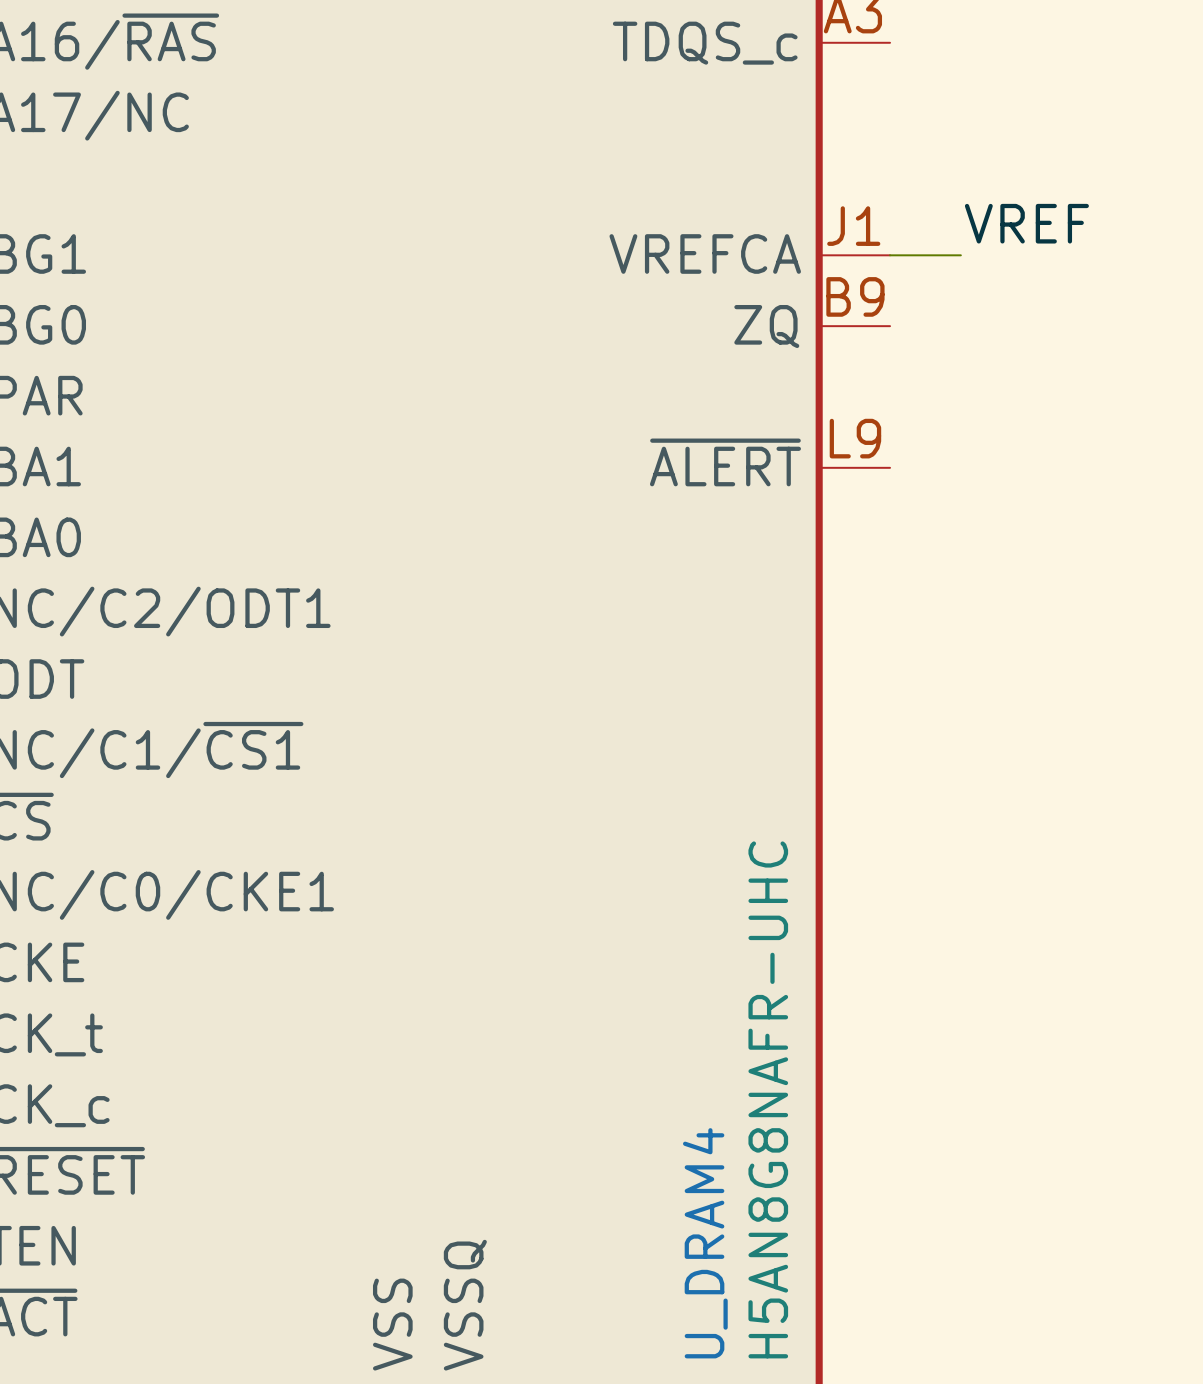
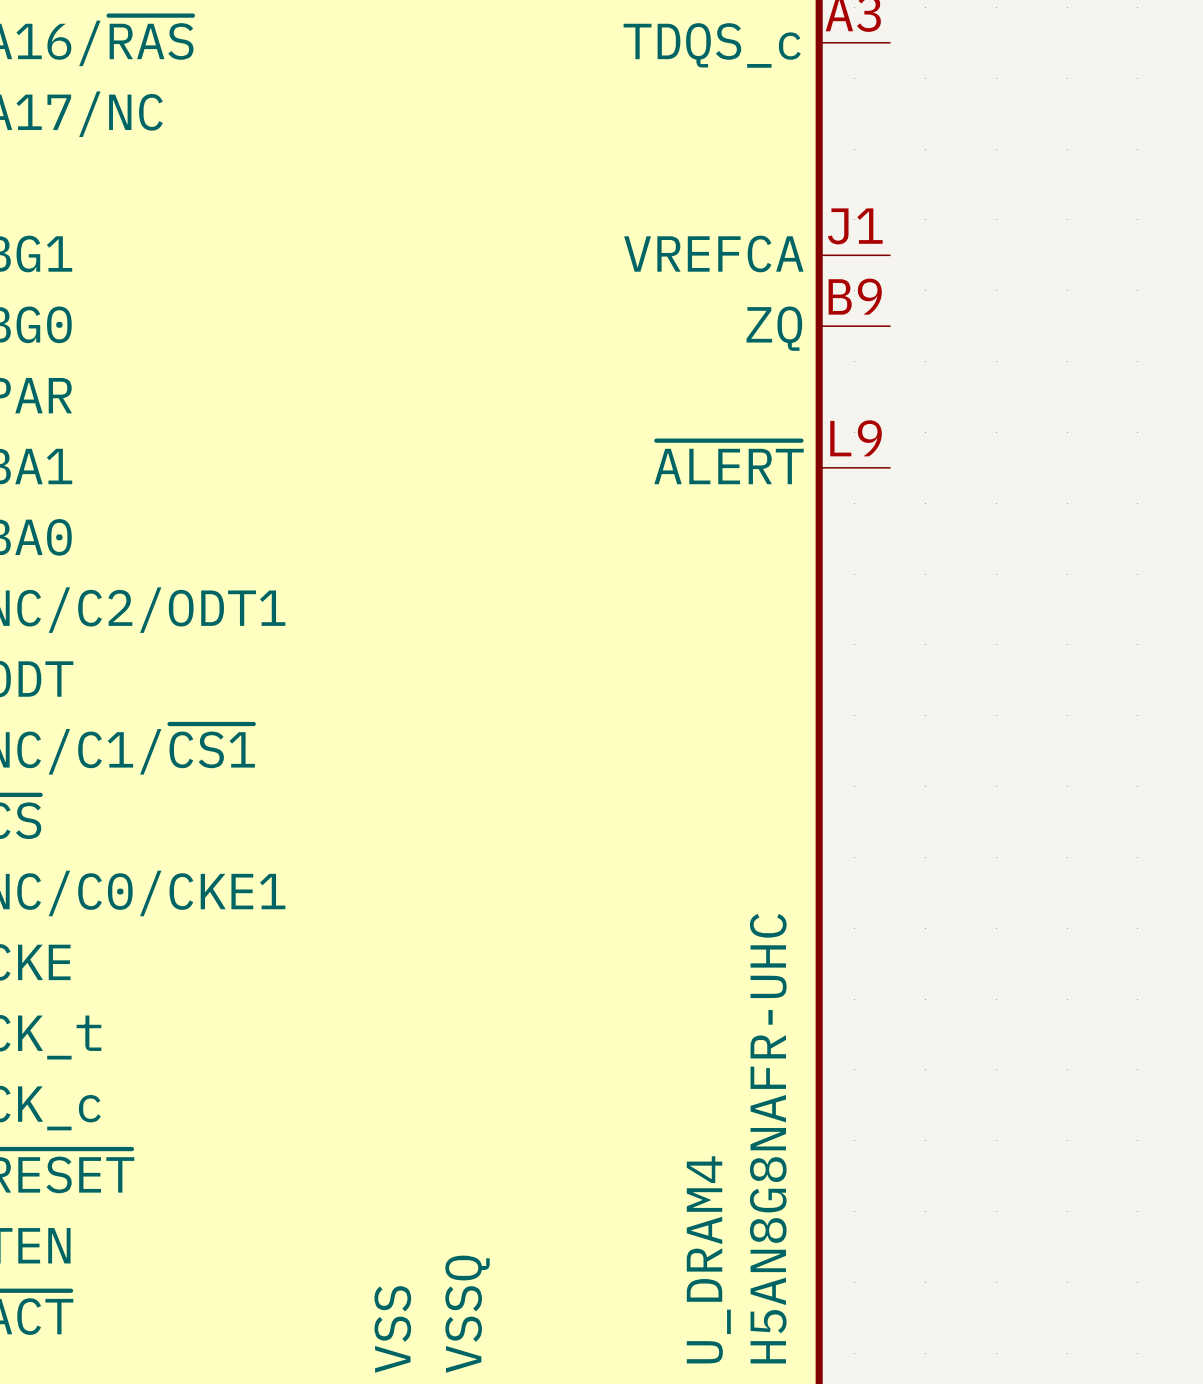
label: VREF (1026, 223) -> none
wire: (890, 255) (960, 255) -> none

